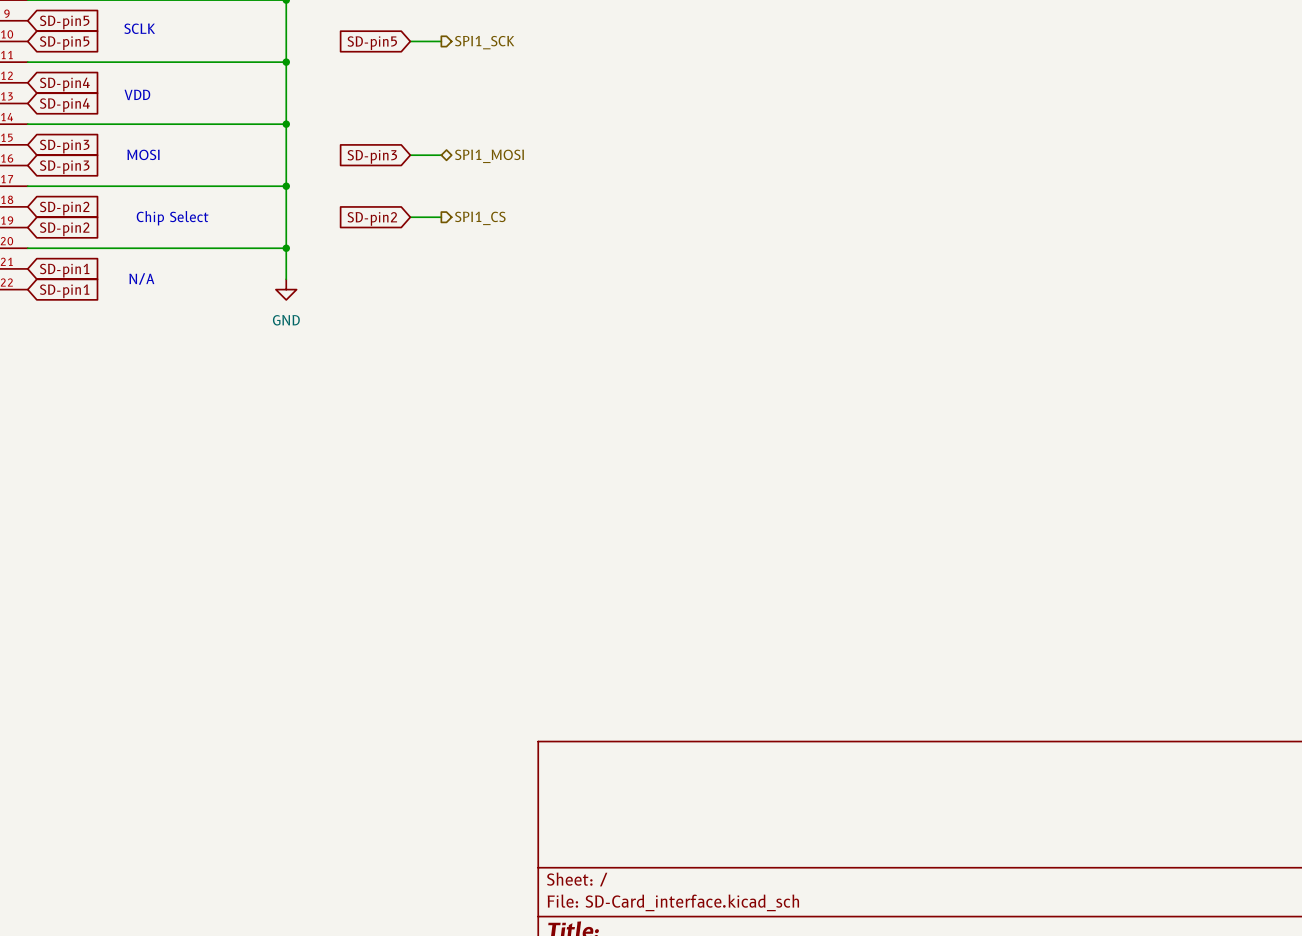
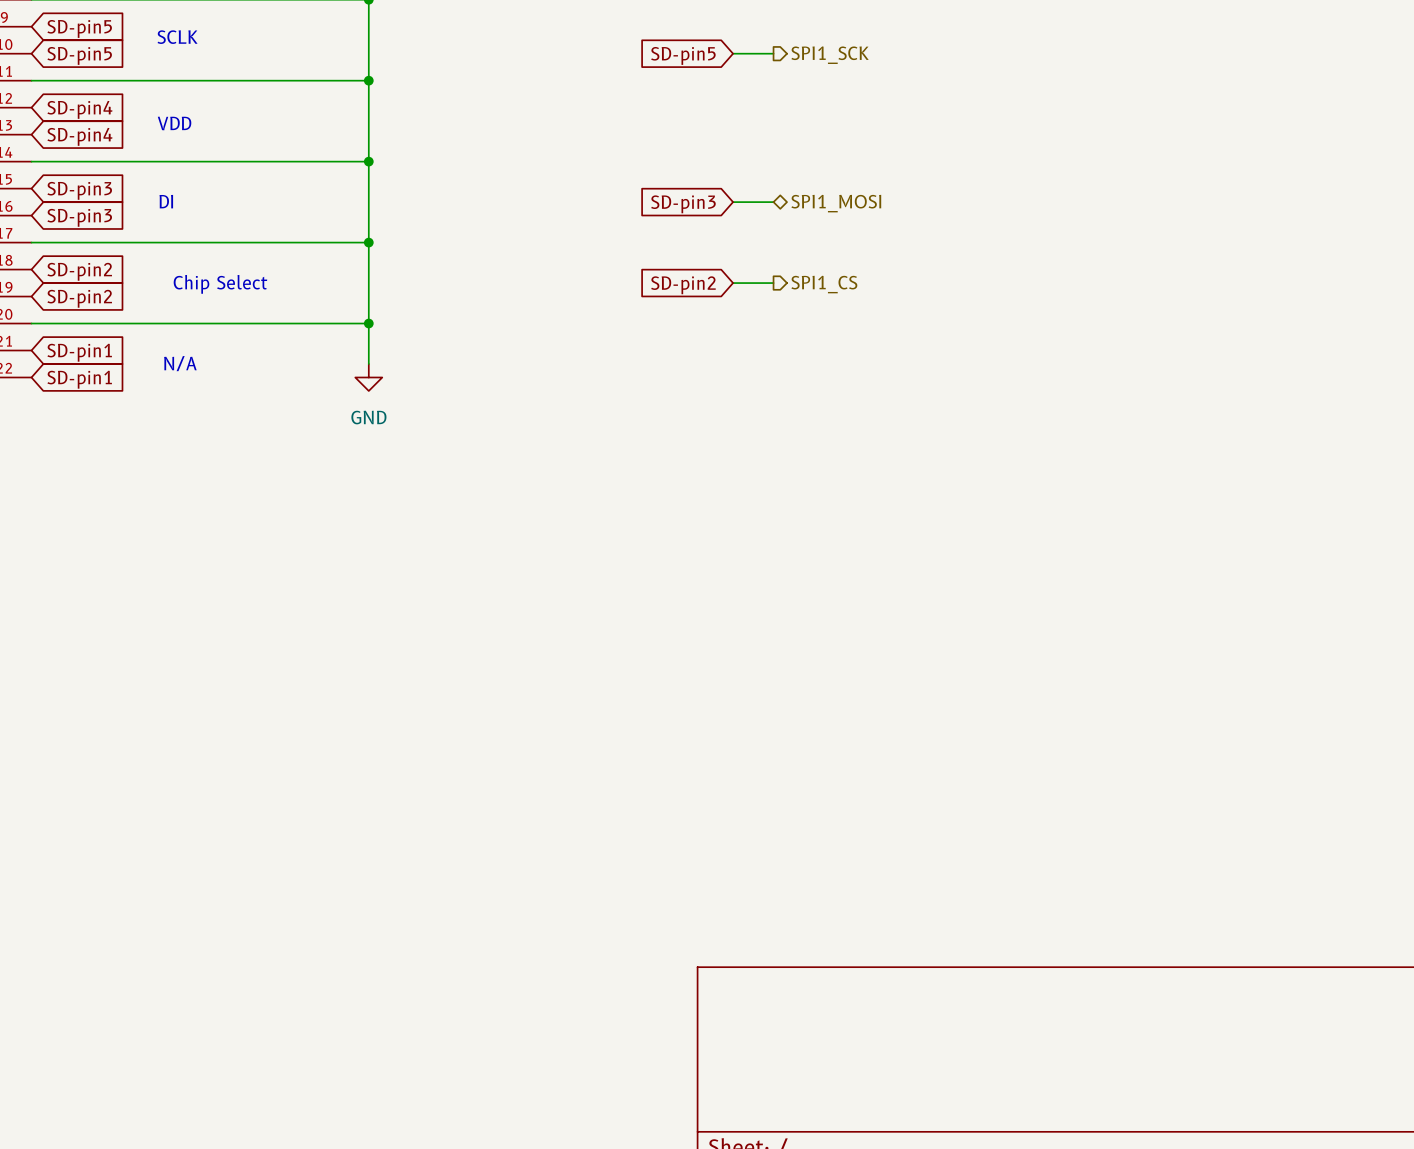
wire: (410, 41) (441, 41) -> (733, 53) (773, 53)
hierarchical label position: SPI1_SCK (484, 42) -> SPI1_SCK (830, 55)
global label position: SD-pin5 (372, 43) -> SD-pin5 (683, 55)
text: none -> DI (166, 201)
text: MOSI (143, 154) -> none
wire: (410, 155) (441, 155) -> (733, 202) (773, 202)
global label position: SD-pin3 (372, 156) -> SD-pin3 (683, 204)
hierarchical label position: SPI1_MOSI (489, 156) -> SPI1_MOSI (836, 203)
wire: (410, 217) (441, 217) -> (733, 283) (773, 283)
global label position: SD-pin2 (372, 218) -> SD-pin2 (683, 285)
hierarchical label position: SPI1_CS (480, 218) -> SPI1_CS (824, 284)

